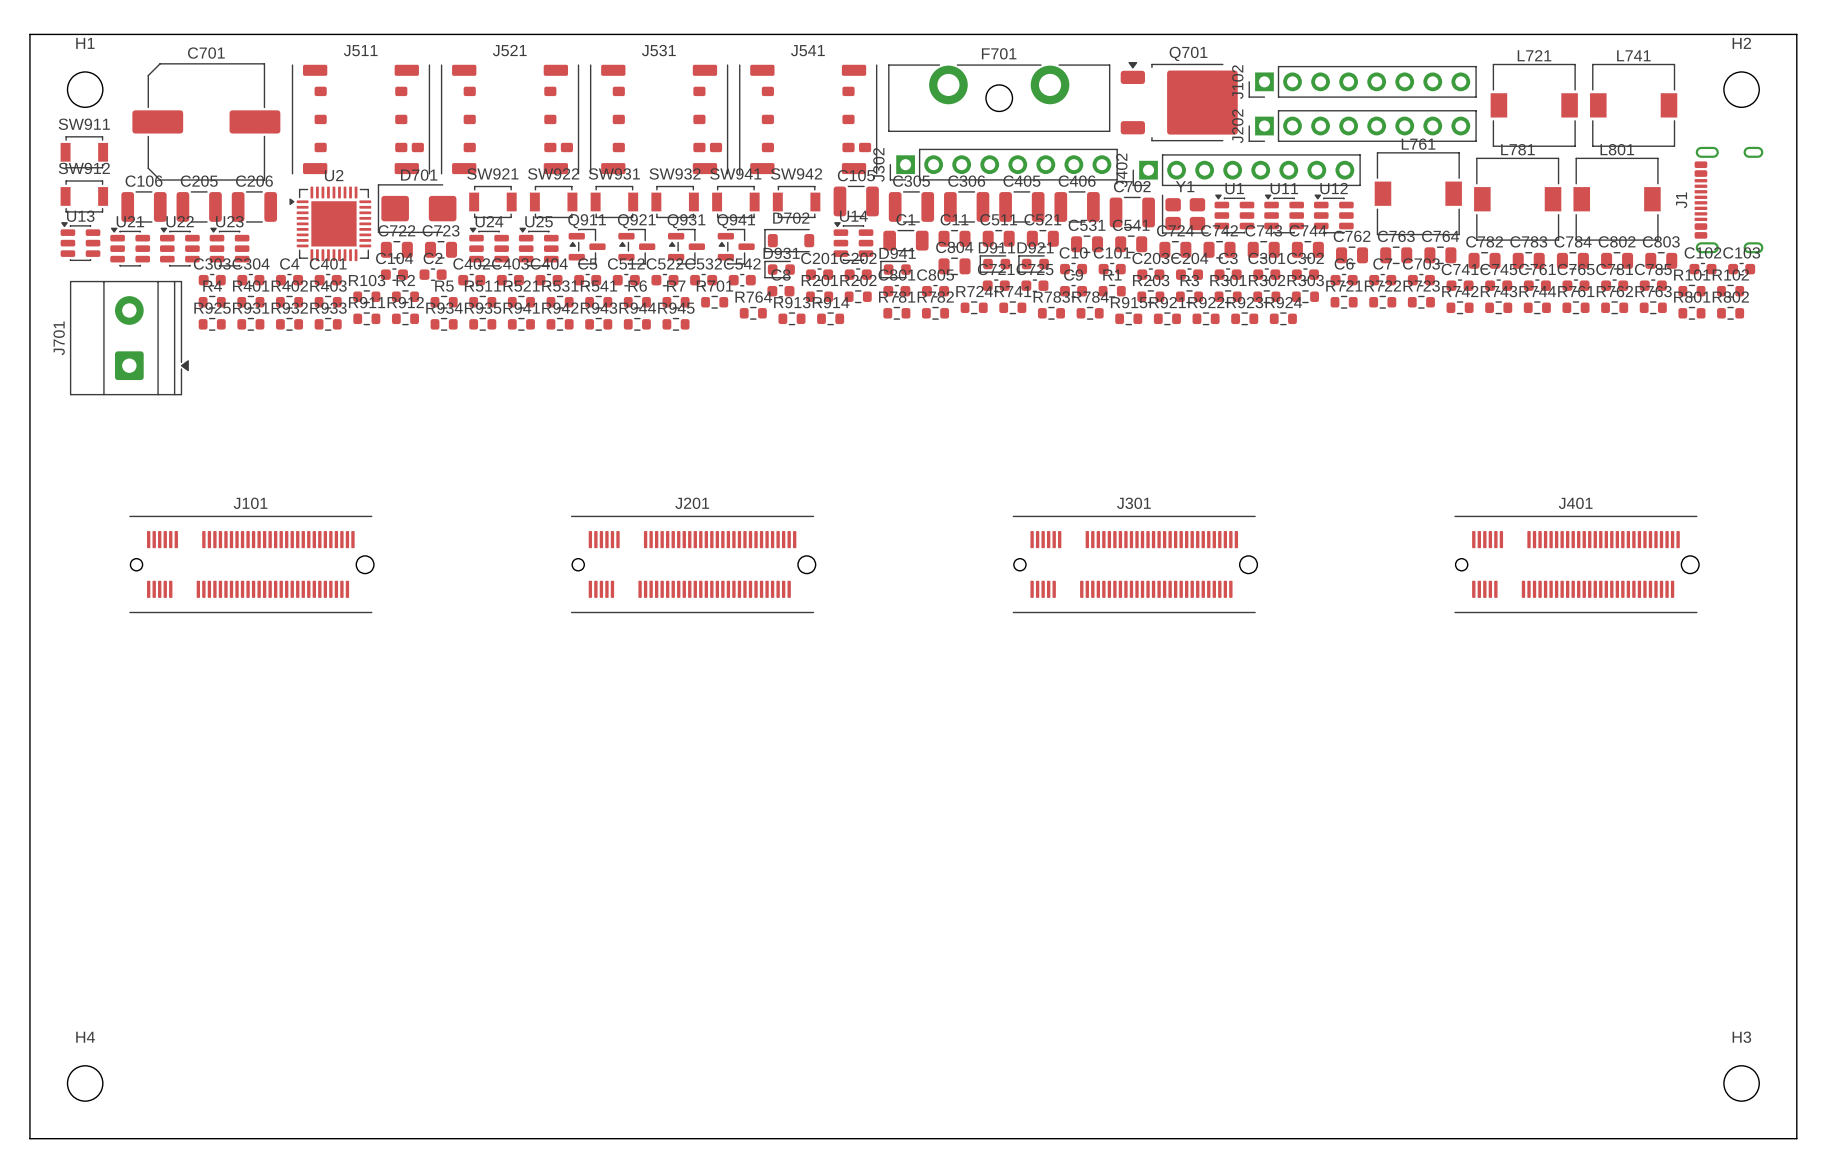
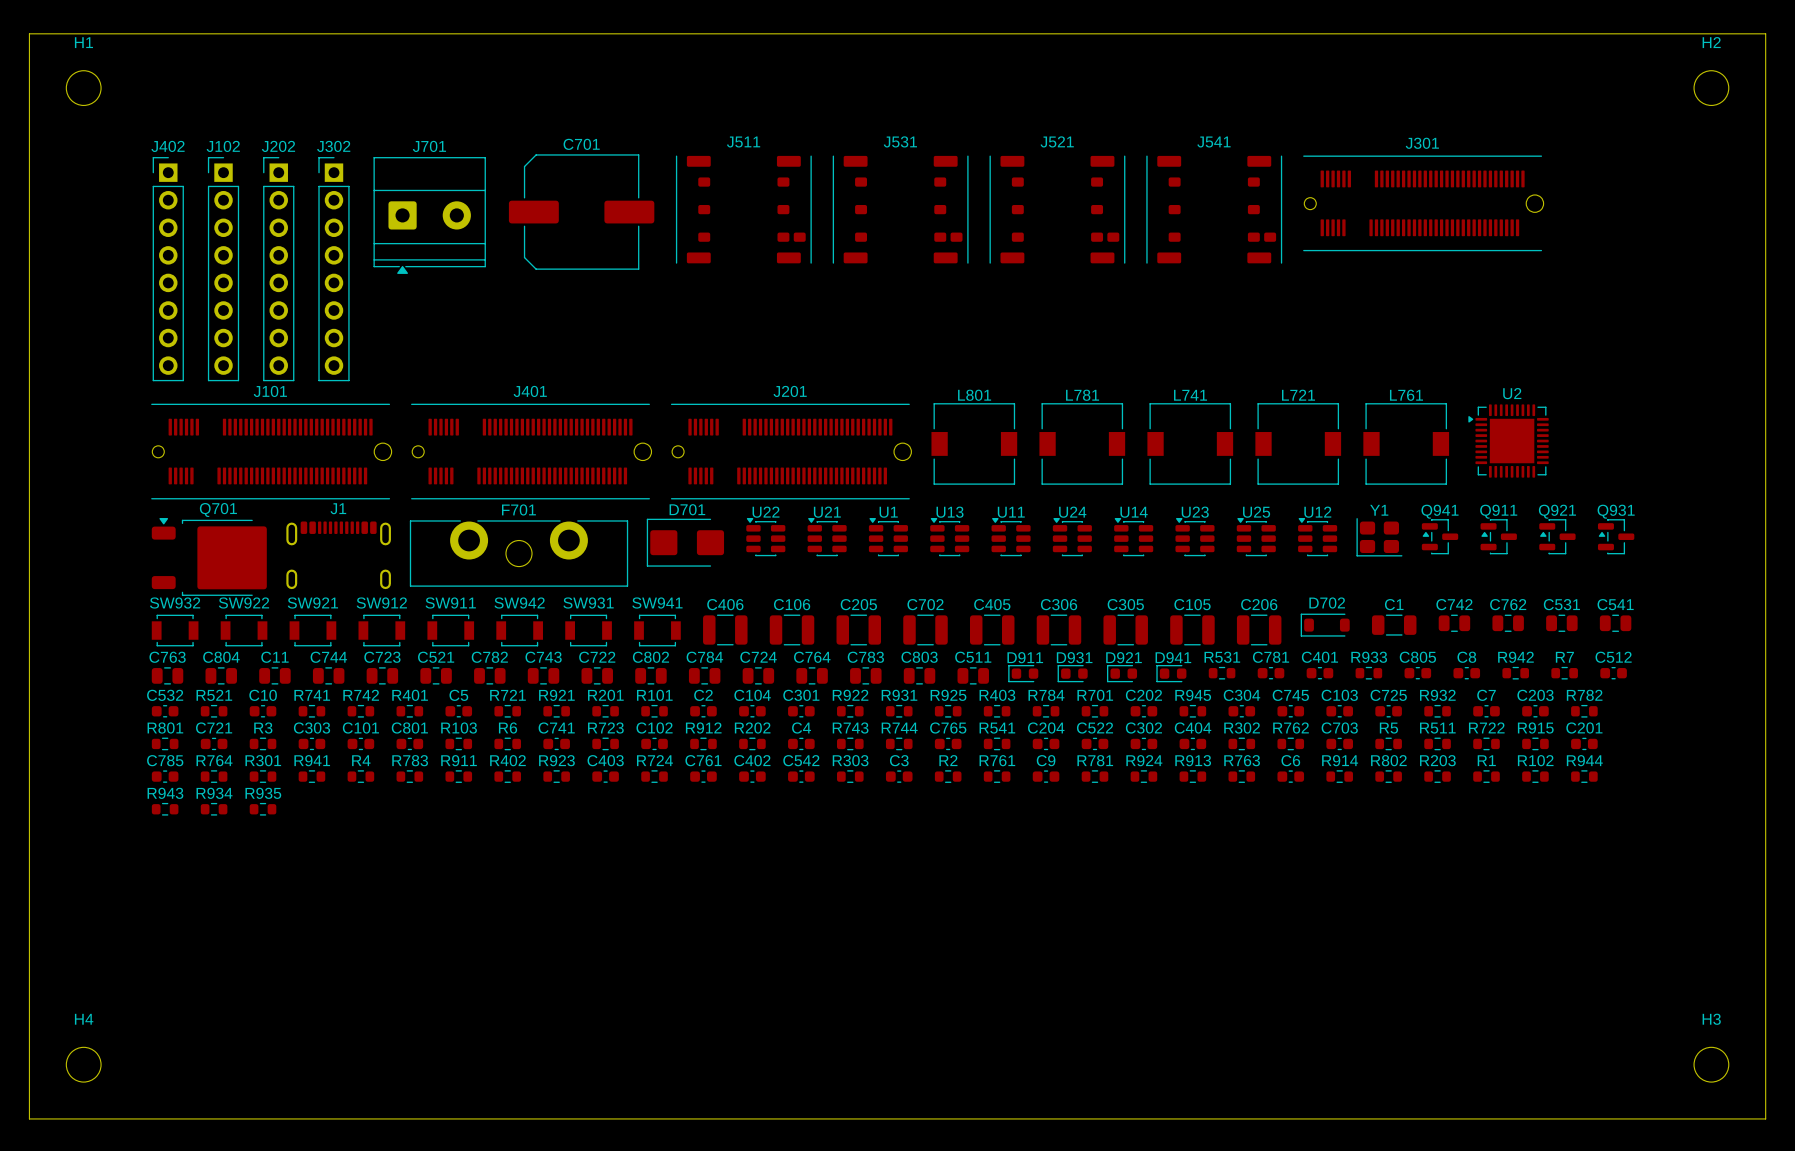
J102 rotation: 0° (1362, 81) -> 90° clockwise (223, 269)
J102 position: (1362, 81) -> (223, 269)
F701 position: (999, 98) -> (519, 553)
Q701 position: (1179, 101) -> (209, 556)
L721 position: (1534, 105) -> (1298, 443)
L741 position: (1633, 105) -> (1190, 443)
J511 position: (360, 119) -> (743, 209)
J521 position: (510, 119) -> (1057, 209)
J531 position: (659, 119) -> (900, 209)
J541 position: (808, 119) -> (1214, 209)
C701 position: (206, 121) -> (581, 212)
J202 rotation: 0° (1362, 126) -> 90° clockwise (278, 269)
J202 position: (1362, 126) -> (278, 269)
SW911 position: (84, 152) -> (450, 630)
J302 rotation: 0° (1003, 164) -> 90° clockwise (333, 269)
J302 position: (1003, 164) -> (333, 269)
J402 rotation: 0° (1246, 170) -> 90° clockwise (168, 269)
J402 position: (1246, 170) -> (168, 269)
L761 position: (1418, 193) -> (1406, 443)
SW912 position: (84, 196) -> (381, 630)
L781 position: (1517, 199) -> (1082, 443)
L801 position: (1617, 199) -> (974, 443)
J1 rotation: 0° (1728, 200) -> 90° clockwise (338, 555)
J1 position: (1728, 200) -> (338, 555)
SW921 position: (492, 201) -> (312, 630)
SW922 position: (553, 201) -> (244, 630)
SW931 position: (614, 201) -> (588, 630)
SW932 position: (675, 201) -> (175, 630)
SW941 position: (735, 201) -> (657, 630)
SW942 position: (796, 201) -> (519, 630)
C105 position: (856, 201) -> (1192, 629)
C106 position: (143, 206) -> (792, 629)
C205 position: (199, 206) -> (858, 629)
C206 position: (254, 206) -> (1259, 629)
C305 position: (911, 206) -> (1125, 629)
C306 position: (966, 206) -> (1058, 629)
C405 position: (1021, 206) -> (992, 629)
C406 position: (1077, 206) -> (725, 629)
D701 position: (417, 208) -> (685, 542)
C702 position: (1132, 212) -> (925, 629)
U1 position: (1234, 213) -> (888, 537)
U11 position: (1284, 213) -> (1011, 537)
U12 position: (1333, 213) -> (1317, 537)
Y1 position: (1185, 214) -> (1379, 537)
U2 position: (330, 223) -> (1508, 441)
C11 position: (954, 238) -> (274, 675)
C511 position: (998, 238) -> (973, 675)
C521 position: (1042, 238) -> (436, 675)
D702 position: (789, 240) -> (1325, 625)
C1 position: (905, 240) -> (1394, 625)
U13 position: (80, 241) -> (949, 537)
U14 position: (853, 241) -> (1133, 537)
C531 position: (1087, 244) -> (1561, 623)
C541 position: (1131, 244) -> (1615, 623)
Q911 position: (587, 246) -> (1498, 536)
Q921 position: (636, 246) -> (1557, 536)
Q931 position: (686, 246) -> (1616, 536)
Q941 position: (736, 246) -> (1440, 536)
U21 position: (130, 247) -> (827, 537)
U22 position: (179, 247) -> (765, 537)
U23 position: (229, 247) -> (1194, 537)
U24 position: (489, 247) -> (1072, 537)
U25 position: (538, 247) -> (1256, 537)
C722 position: (396, 249) -> (597, 675)
C723 position: (441, 249) -> (382, 675)
C724 position: (1175, 249) -> (758, 675)
C742 position: (1219, 249) -> (1454, 623)
C743 position: (1263, 249) -> (543, 675)
C744 position: (1307, 249) -> (328, 675)
C762 position: (1352, 255) -> (1508, 623)
C763 position: (1396, 255) -> (167, 675)
C764 position: (1440, 255) -> (812, 675)
C782 position: (1484, 260) -> (489, 675)
C783 position: (1528, 260) -> (865, 675)
C784 position: (1572, 260) -> (704, 675)
C802 position: (1617, 260) -> (650, 675)
C803 position: (1661, 260) -> (919, 675)
D911 position: (994, 264) -> (1023, 673)
D921 position: (1033, 264) -> (1122, 673)
C804 position: (954, 266) -> (221, 675)
D931 position: (779, 269) -> (1072, 673)
D941 position: (895, 269) -> (1171, 673)
C10 position: (1073, 269) -> (263, 711)
C101 position: (1112, 269) -> (360, 743)
C102 position: (1702, 269) -> (654, 743)
C103 position: (1741, 269) -> (1339, 711)
C104 position: (394, 274) -> (752, 711)
C2 position: (433, 274) -> (703, 711)
C201 position: (819, 274) -> (1584, 743)
C202 position: (858, 274) -> (1143, 711)
C203 position: (1150, 274) -> (1535, 711)
C204 position: (1189, 274) -> (1046, 743)
C3 position: (1228, 274) -> (899, 776)
C301 position: (1266, 274) -> (801, 711)
C302 position: (1305, 274) -> (1143, 743)
C303 position: (212, 280) -> (311, 743)
C304 position: (250, 280) -> (1241, 711)
C4 position: (289, 280) -> (801, 743)
C401 position: (328, 280) -> (1319, 673)
C402 position: (471, 280) -> (752, 776)
C403 position: (510, 280) -> (605, 776)
C404 position: (549, 280) -> (1192, 743)
C5 position: (587, 280) -> (458, 711)
C512 position: (626, 280) -> (1613, 673)
C522 position: (664, 280) -> (1094, 743)
C532 position: (703, 280) -> (165, 711)
C542 position: (742, 280) -> (801, 776)
C6 position: (1344, 280) -> (1290, 776)
C7 position: (1382, 280) -> (1486, 711)
C703 position: (1421, 280) -> (1339, 743)
C721 position: (996, 285) -> (214, 743)
C725 position: (1034, 285) -> (1388, 711)
C741 position: (1460, 285) -> (556, 743)
C745 position: (1498, 285) -> (1290, 711)
C761 position: (1537, 285) -> (703, 776)
C765 position: (1575, 285) -> (948, 743)
C781 position: (1614, 285) -> (1271, 673)
C785 position: (1653, 285) -> (165, 776)
C8 position: (780, 291) -> (1466, 673)
C801 position: (896, 291) -> (409, 743)
C805 position: (935, 291) -> (1417, 673)
C9 position: (1073, 291) -> (1046, 776)
R1 position: (1112, 291) -> (1486, 776)
R101 position: (1691, 291) -> (654, 711)
R102 position: (1730, 291) -> (1535, 776)
R103 position: (366, 296) -> (458, 743)
R2 position: (405, 296) -> (948, 776)
R201 position: (819, 296) -> (605, 711)
R202 position: (858, 296) -> (752, 743)
R203 position: (1150, 296) -> (1437, 776)
R3 position: (1189, 296) -> (263, 743)
R301 position: (1228, 296) -> (263, 776)
R302 position: (1266, 296) -> (1241, 743)
R303 position: (1305, 296) -> (850, 776)
R4 position: (212, 302) -> (360, 776)
R401 position: (250, 302) -> (409, 711)
R402 position: (289, 302) -> (507, 776)
R403 position: (328, 302) -> (997, 711)
R5 position: (444, 302) -> (1388, 743)
R511 position: (482, 302) -> (1437, 743)
R521 position: (521, 302) -> (214, 711)
R531 position: (560, 302) -> (1222, 673)
R541 position: (598, 302) -> (997, 743)
R6 position: (637, 302) -> (507, 743)
R7 position: (676, 302) -> (1564, 673)
R701 position: (714, 302) -> (1094, 711)
R721 position: (1344, 302) -> (507, 711)
R722 position: (1382, 302) -> (1486, 743)
R723 position: (1421, 302) -> (605, 743)
R724 position: (974, 307) -> (654, 776)
R741 position: (1012, 307) -> (311, 711)
R742 position: (1460, 307) -> (360, 711)
R743 position: (1498, 307) -> (850, 743)
R744 position: (1537, 307) -> (899, 743)
R761 position: (1575, 307) -> (997, 776)
R762 position: (1614, 307) -> (1290, 743)
R763 position: (1653, 307) -> (1241, 776)
R764 position: (753, 313) -> (214, 776)
R781 position: (896, 313) -> (1094, 776)
R782 position: (935, 313) -> (1584, 711)
R783 position: (1051, 313) -> (409, 776)
R784 position: (1090, 313) -> (1046, 711)
R801 position: (1691, 313) -> (165, 743)
R802 position: (1730, 313) -> (1388, 776)
R911 position: (366, 318) -> (458, 776)
R912 position: (405, 318) -> (703, 743)
R913 position: (791, 318) -> (1192, 776)
R914 position: (830, 318) -> (1339, 776)
R915 position: (1128, 318) -> (1535, 743)
R921 position: (1167, 318) -> (556, 711)
R922 position: (1206, 318) -> (850, 711)
R923 position: (1244, 318) -> (556, 776)
R924 position: (1283, 318) -> (1143, 776)
R925 position: (212, 324) -> (948, 711)
R931 position: (250, 324) -> (899, 711)
R932 position: (289, 324) -> (1437, 711)
R933 position: (328, 324) -> (1368, 673)
R934 position: (444, 324) -> (214, 809)
R935 position: (482, 324) -> (263, 809)
R941 position: (521, 324) -> (311, 776)
R942 position: (560, 324) -> (1515, 673)
R943 position: (598, 324) -> (165, 809)
R944 position: (637, 324) -> (1584, 776)
R945 position: (676, 324) -> (1192, 711)
J701 rotation: 0° (129, 338) -> 90° clockwise (429, 215)
J701 position: (129, 338) -> (429, 215)
J101 position: (251, 564) -> (271, 451)
J201 position: (693, 564) -> (791, 451)
J301 position: (1135, 564) -> (1423, 203)
J401 position: (1576, 564) -> (531, 451)

